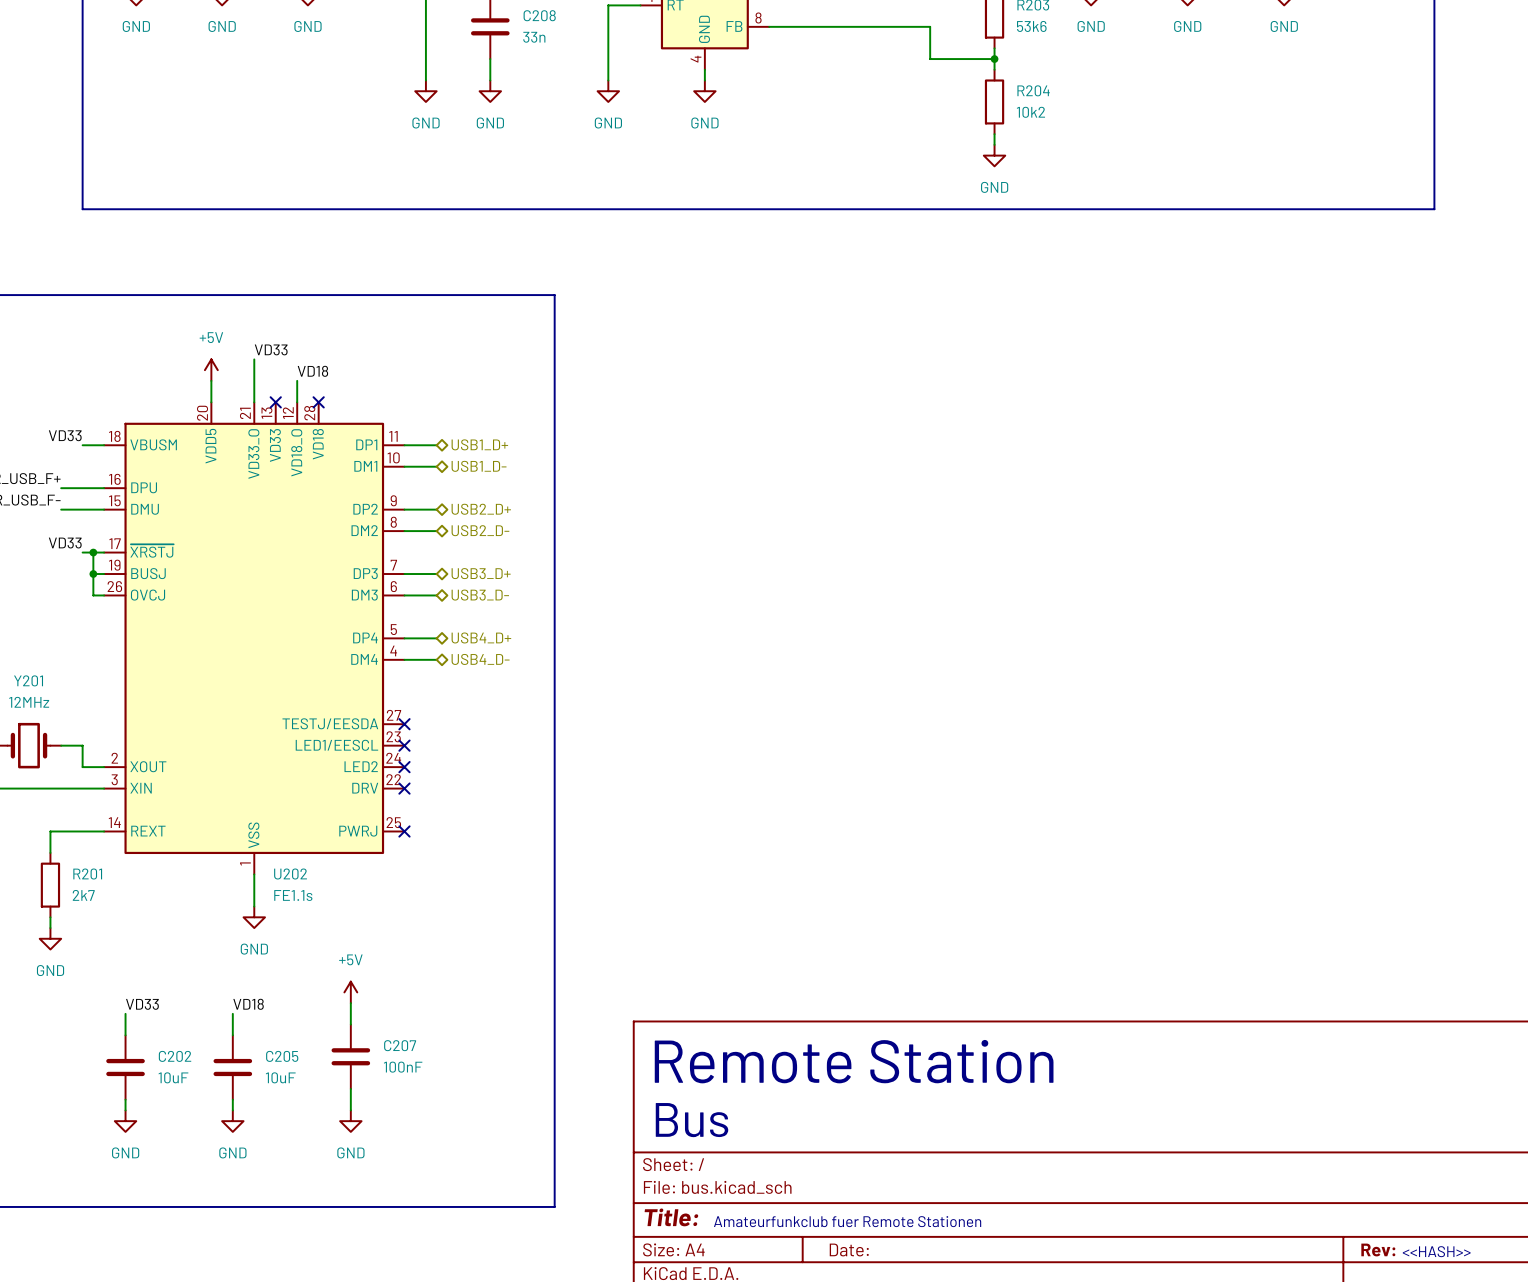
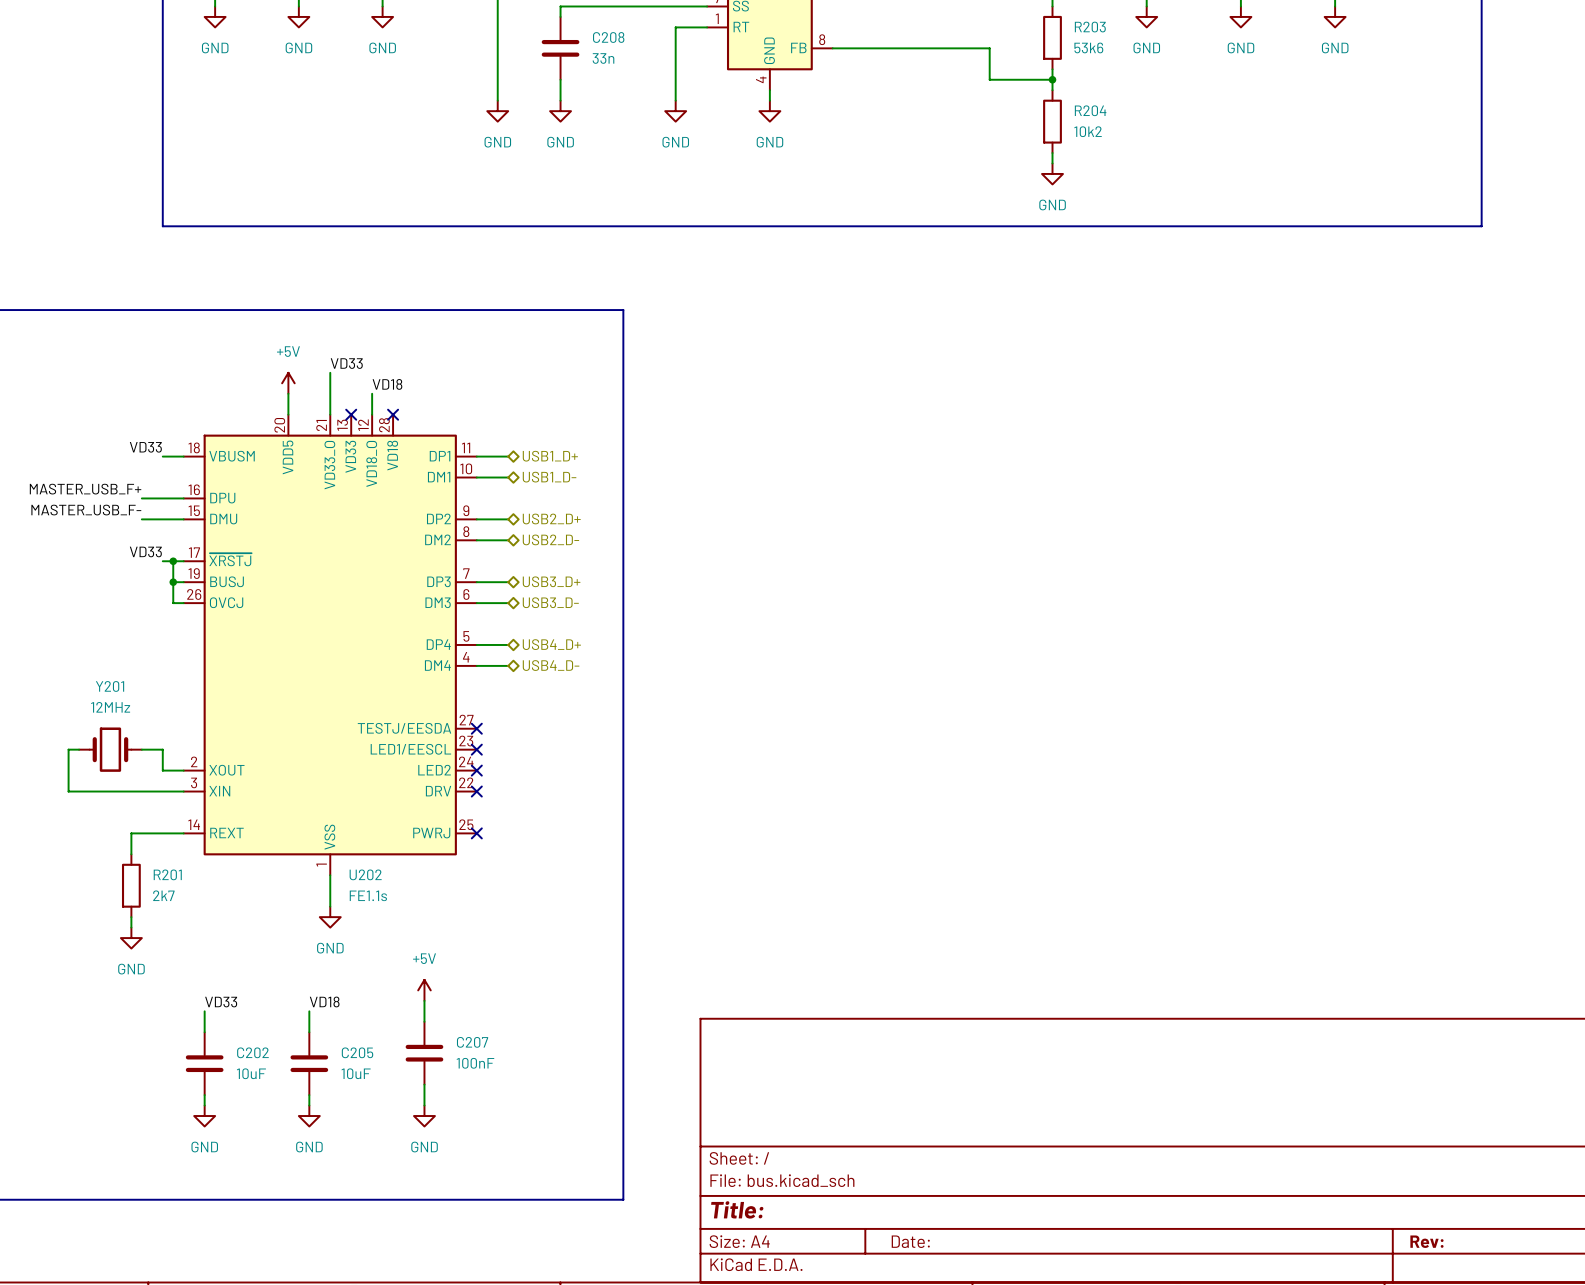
text: Remote Station (854, 1061) -> none
text: Bus (692, 1120) -> none
text: Amateurfunkclub fuer Remote Stationen (847, 1221) -> none
text: <<HASH>> (1436, 1251) -> none

